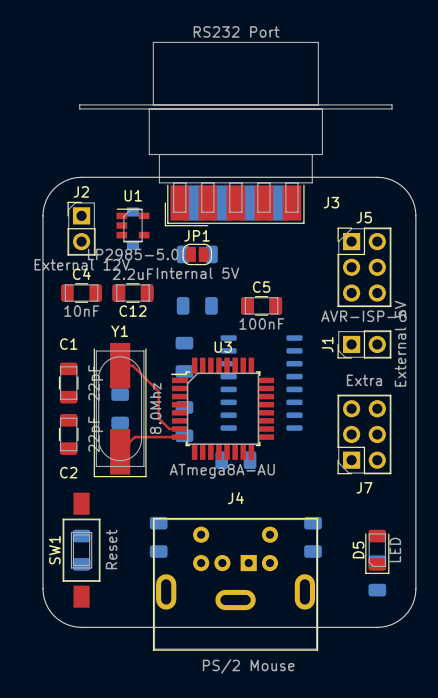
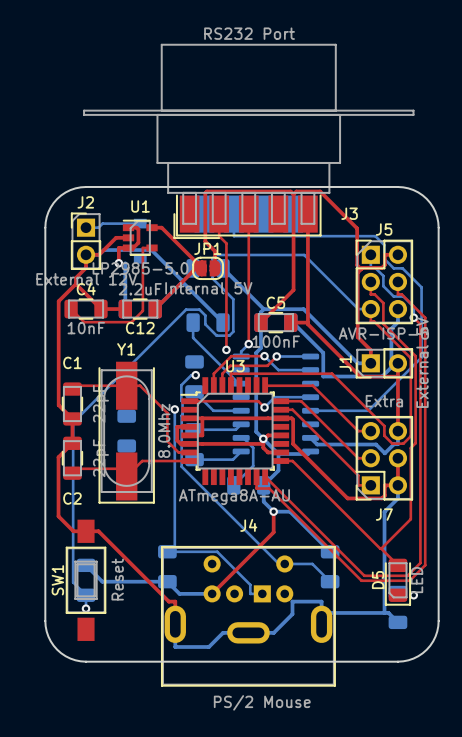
top track: none -> (293, 194) (296, 191) (320, 191) (357, 228) (357, 265) (361, 269)
top track: none -> (293, 194) (290, 191) (206, 191) (205, 193) (205, 241) (215, 251) (215, 268)
top track: none -> (293, 194) (293, 289) (260, 322)
top track: none -> (219, 214) (219, 236) (226, 243) (226, 349)
bottom track: none -> (233, 214) (233, 236) (375, 236) (384, 245) (384, 258) (393, 268) (402, 268) (421, 287) (421, 357) (368, 410) (310, 410)
top track: none -> (248, 214) (248, 344)
top track: none -> (307, 214) (307, 324) (360, 376) (397, 376)
bottom track: none -> (140, 223) (102, 223) (98, 227) (86, 227)
top track: none -> (128, 227) (138, 229) (138, 242) (133, 247) (118, 247) (118, 263)
top track: none -> (152, 227) (161, 227) (195, 261) (195, 268)
top track: none -> (128, 237) (116, 237) (99, 254) (86, 254) (86, 267) (75, 277) (75, 284)
top track: none -> (152, 247) (142, 247) (142, 310) (131, 322) (84, 322) (71, 309)
bottom track: none -> (86, 254) (99, 254) (103, 250) (151, 250) (182, 281)
bottom track: none -> (370, 254) (370, 267) (374, 267) (383, 275) (383, 286) (393, 296) (403, 296) (413, 306) (413, 317)
top track: none -> (397, 254) (384, 254) (384, 265) (382, 267) (362, 267) (357, 272) (357, 337) (370, 350) (370, 363)
via: none -> (118, 263)
bottom track: none -> (125, 263) (125, 309)
top track: none -> (195, 268) (155, 309)
bottom track: none -> (223, 268) (263, 309)
bottom track: none -> (182, 281) (223, 322)
top track: none -> (370, 281) (370, 294) (374, 294) (383, 303) (383, 323) (415, 356) (415, 443) (410, 448) (410, 519) (381, 548)
top track: none -> (397, 281) (397, 294) (401, 294) (425, 317) (425, 565) (409, 580) (361, 580) (269, 488) (256, 488) (256, 476)
top track: none -> (75, 284) (100, 309) (125, 309)
top track: none -> (75, 284) (58, 301) (58, 405) (72, 418) (72, 443) (58, 457) (58, 516) (73, 531) (98, 531) (168, 601) (175, 601) (175, 624)
bottom track: none -> (263, 309) (260, 312) (260, 348) (256, 352) (256, 431) (278, 454)
bottom track: none -> (263, 309) (303, 309) (357, 363) (370, 363)
top track: none -> (370, 309) (370, 321) (374, 321) (410, 358) (410, 436) (403, 443) (392, 443) (384, 435) (384, 426) (332, 373) (230, 373) (230, 385)
bottom track: none -> (370, 309) (358, 309) (304, 254) (216, 254) (212, 258) (212, 278) (233, 299) (233, 331) (229, 335) (216, 335) (205, 324) (205, 315) (199, 309) (186, 309) (73, 422) (73, 582) (86, 595) (86, 608)
bottom track: none -> (397, 309) (397, 322) (391, 328) (391, 367) (382, 376) (323, 376) (323, 352) (290, 322)
top track: none -> (413, 317) (420, 324) (420, 562) (407, 575) (364, 575) (265, 476)
via: none -> (413, 317)
bottom track: none -> (193, 322) (193, 337) (238, 383) (241, 383)
top track: none -> (290, 322) (307, 322)
bottom track: none -> (248, 344) (241, 351) (241, 356)
via: none -> (248, 344)
via: none -> (226, 349)
top track: none -> (264, 356) (231, 356) (213, 373) (213, 385)
bottom track: none -> (264, 356) (278, 370) (310, 370)
via: none -> (264, 356)
top track: none -> (276, 356) (267, 365) (230, 365) (222, 373) (222, 385)
bottom track: none -> (276, 356) (310, 356)
via: none -> (276, 356)
top track: none -> (397, 363) (397, 431)
bottom track: none -> (195, 375) (191, 375) (181, 385) (181, 466) (278, 563) (312, 563) (330, 581)
via: none -> (195, 375)
top track: none -> (126, 385) (75, 385) (72, 389)
top track: none -> (265, 385) (312, 385) (358, 431) (370, 431)
bottom track: none -> (194, 391) (213, 410) (241, 410)
bottom track: none -> (310, 397) (274, 397) (264, 407)
top track: none -> (189, 401) (258, 401) (264, 407)
top track: none -> (280, 401) (301, 401) (358, 458) (370, 458)
via: none -> (264, 407)
bottom track: none -> (174, 409) (174, 551)
via: none -> (174, 409)
top track: none -> (280, 409) (292, 409) (358, 475) (358, 485) (370, 485)
top track: none -> (189, 418) (291, 418) (293, 443) (347, 498) (382, 498) (384, 495) (384, 485) (397, 485) (397, 458)
top track: none -> (202, 418) (202, 435) (189, 435)
bottom track: none -> (241, 424) (235, 429) (194, 429)
top track: none -> (189, 426) (177, 426) (177, 440) (180, 443) (263, 443)
bottom track: none -> (397, 431) (397, 444) (394, 444) (384, 453) (376, 444) (317, 444) (310, 437)
top track: none -> (280, 435) (268, 435) (263, 438) (263, 447) (268, 452) (280, 452)
bottom track: none -> (241, 437) (253, 447) (253, 465) (233, 485)
via: none -> (263, 438)
bottom track: none -> (241, 451) (233, 459) (194, 459)
bottom track: none -> (310, 451) (308, 454) (278, 454)
bottom track: none -> (278, 454) (278, 470) (263, 485) (263, 501) (273, 511) (290, 511) (330, 551)
top track: none -> (280, 461) (292, 461) (381, 548)
top track: none -> (134, 468) (76, 468) (72, 473)
bottom track: none -> (397, 485) (397, 498) (384, 511) (384, 612)
top track: none -> (273, 511) (273, 532) (212, 593)
via: none -> (273, 511)
top track: none -> (381, 548) (397, 565)
bottom track: none -> (167, 551) (217, 551) (250, 584) (250, 593) (262, 593)
bottom track: none -> (86, 565) (102, 581) (167, 581) (179, 593) (212, 593)
via: none -> (413, 595)
via: none -> (86, 608)
bottom track: none -> (321, 612) (388, 612) (397, 622)
bottom track: none -> (175, 624) (175, 647) (208, 647) (223, 632) (273, 632) (292, 614) (292, 601) (321, 601) (321, 624)

